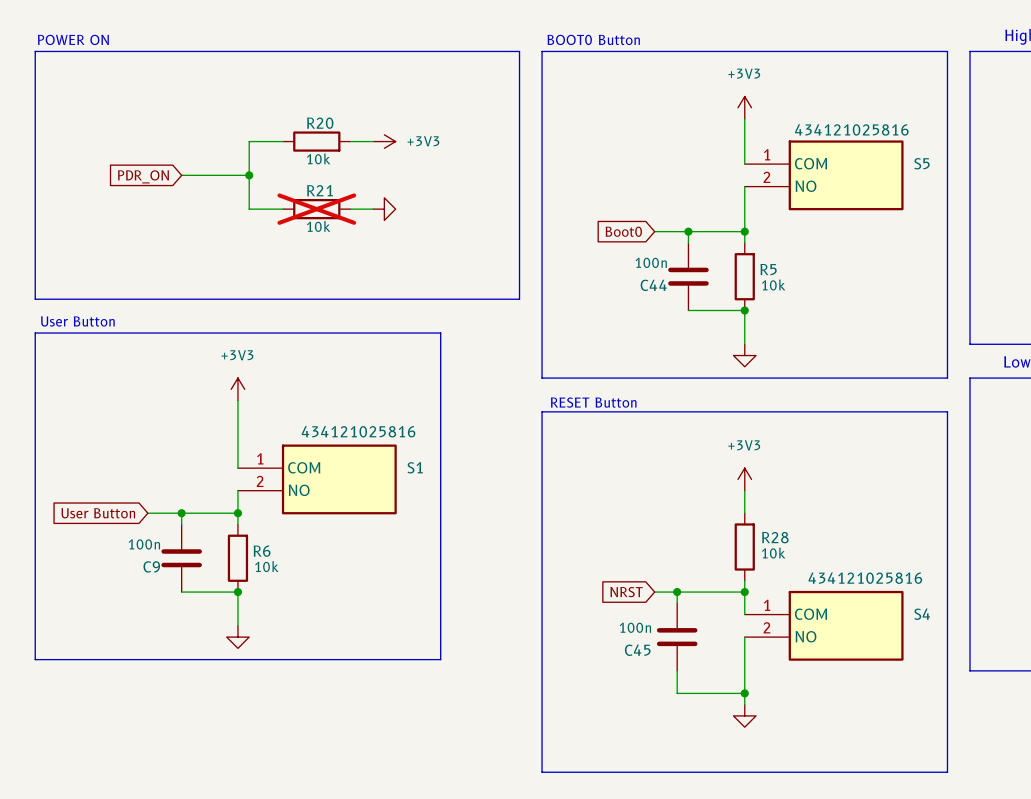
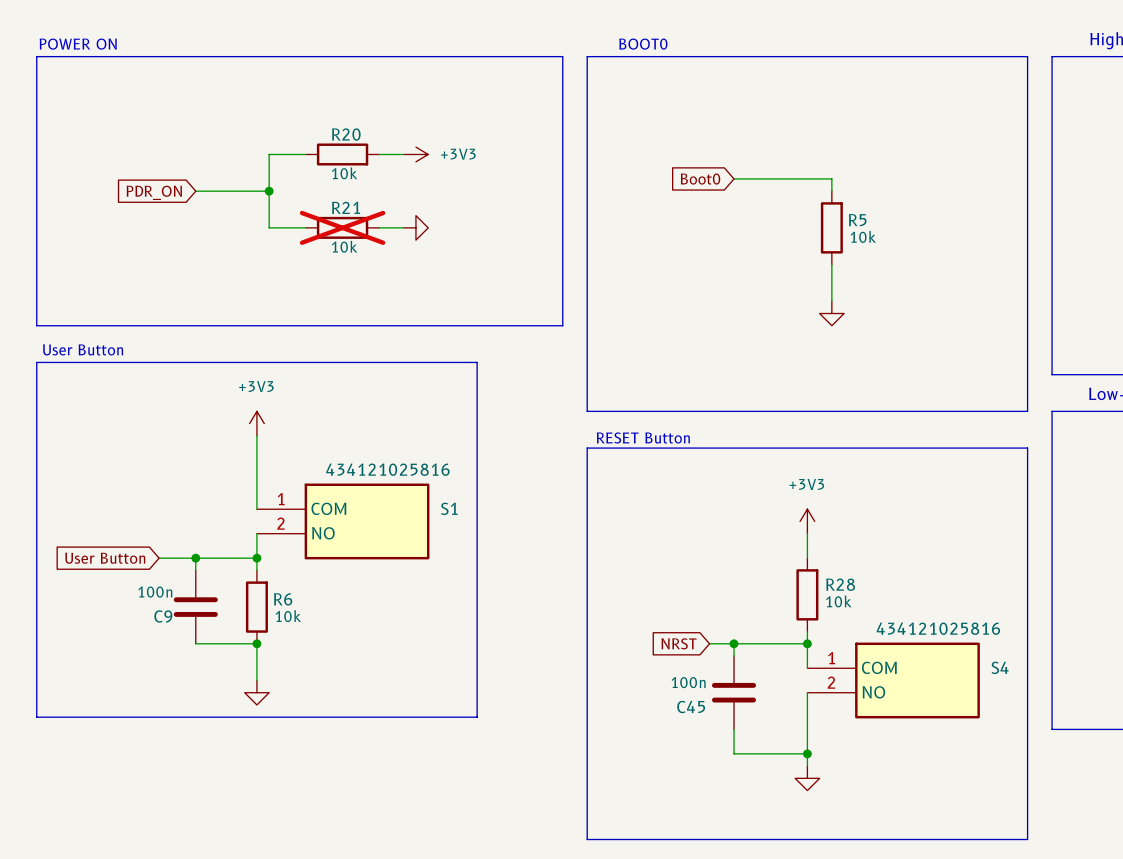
text: BOOT0 Button (593, 39) -> BOOT0 (643, 44)
power symbol: +3V3 (744, 107) -> none
wire: (744, 119) (744, 164) -> none
wire: none -> (734, 178) (831, 178) (831, 191)
S5: 434121025816 (824, 175) -> none
wire: (744, 186) (744, 242) -> none
global label position: Boot0 (623, 231) -> Boot0 (700, 179)
wire: (654, 231) (744, 231) -> none
wire: (688, 231) (688, 242) -> none
junction: (688, 231) -> none
junction: (744, 231) -> none
wire: none -> (831, 264) (831, 301)
C44: 100n (688, 276) -> none
R5 position: (744, 276) -> (831, 227)
wire: (688, 310) (744, 310) (744, 344) -> none
junction: (744, 310) -> none
power symbol position: (744, 355) -> (831, 313)

